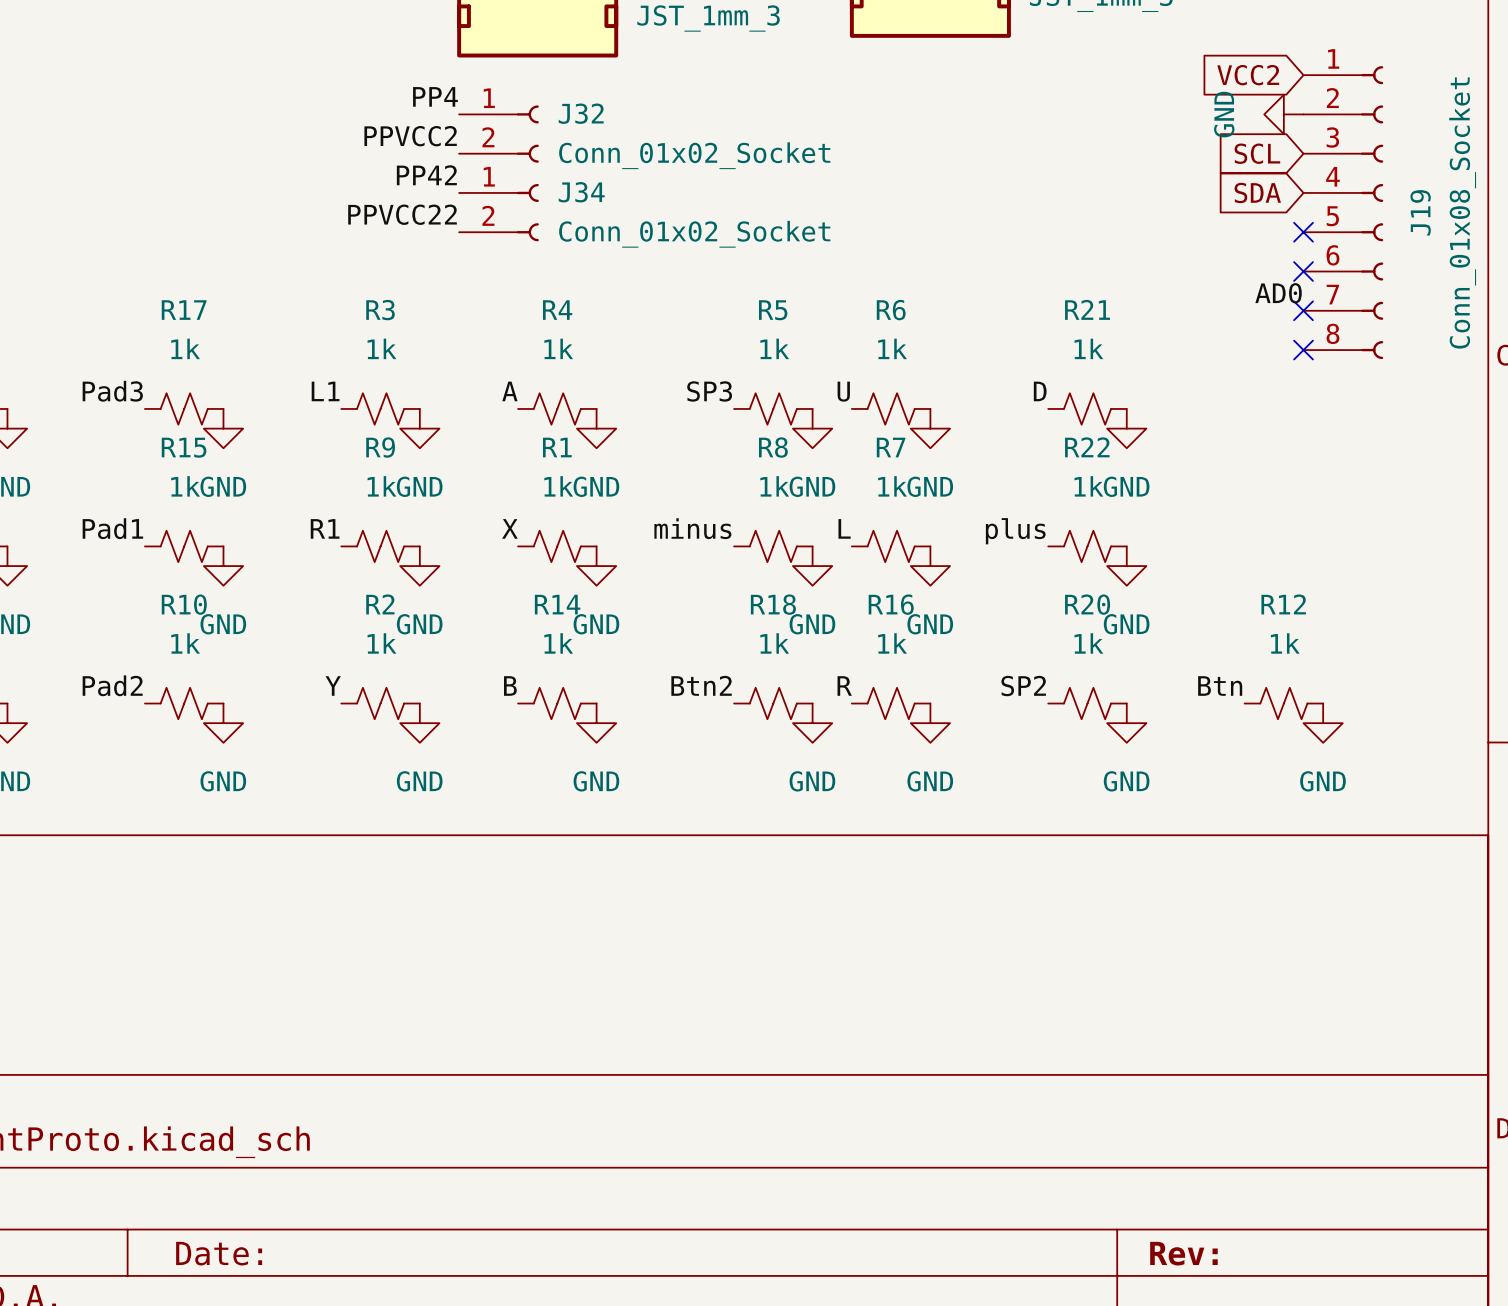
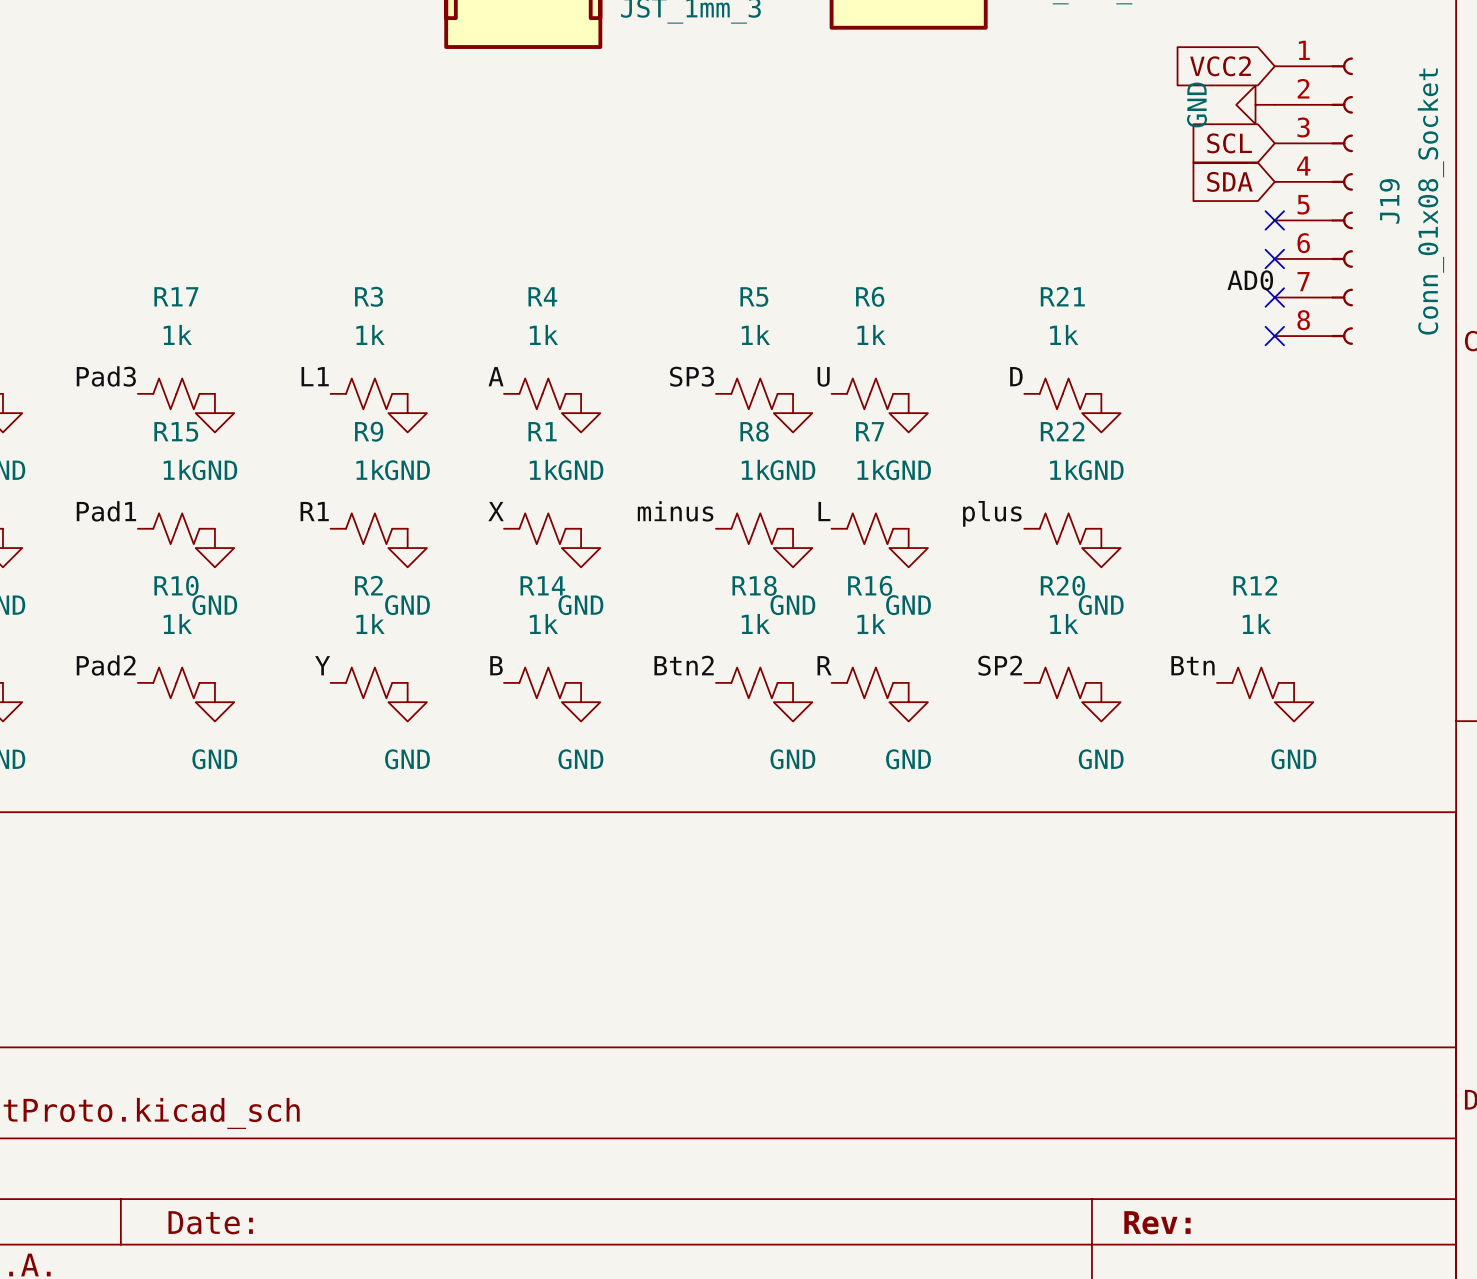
label: PP4 (435, 96) -> none
J32: Conn_01x02_Socket (498, 134) -> none
label: PPVCC2 (410, 136) -> none
label: PP42 (426, 175) -> none
J34: Conn_01x02_Socket (498, 212) -> none
label: PPVCC22 (402, 214) -> none

